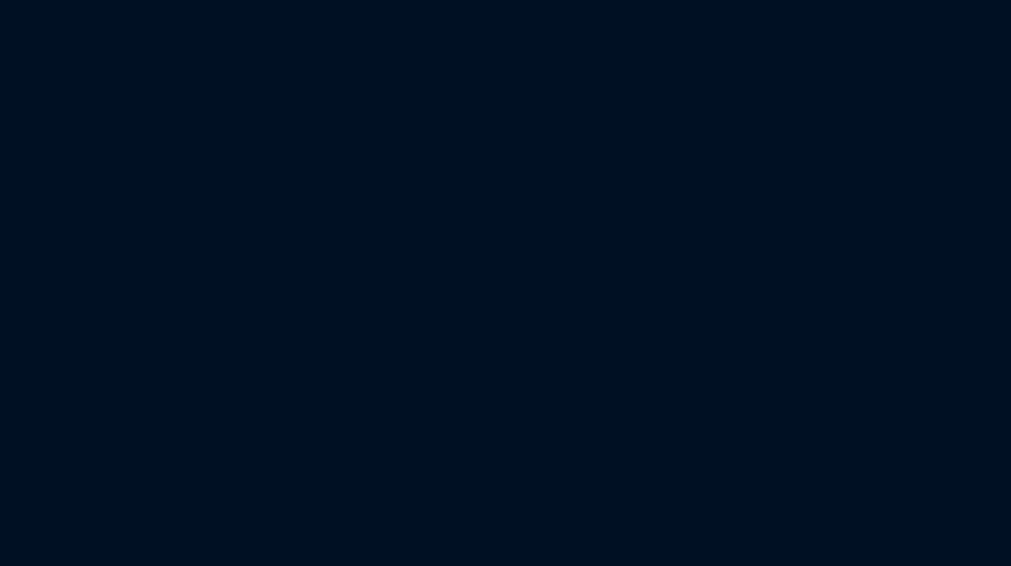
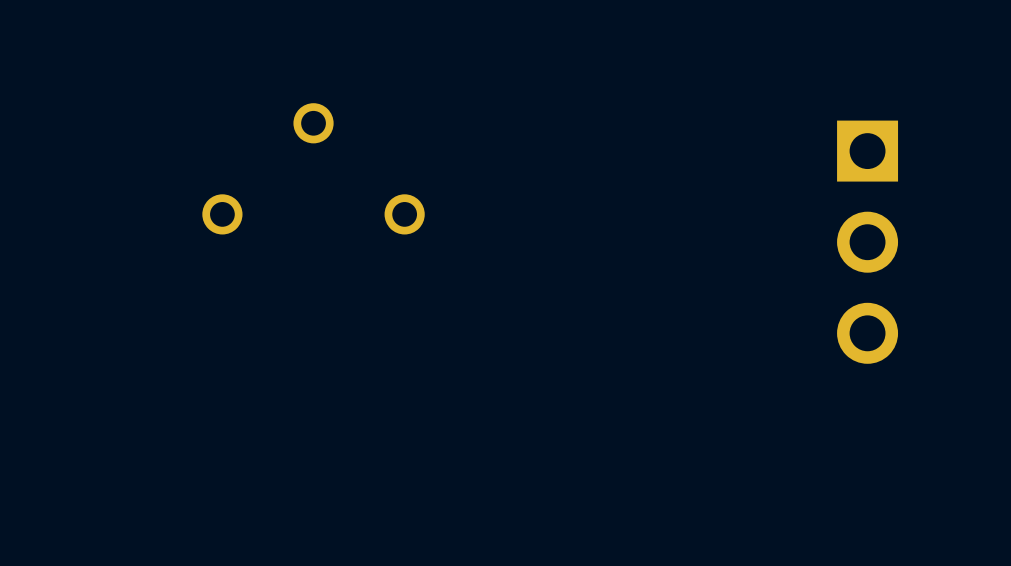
part: none -> (313, 168)
part: none -> (867, 242)

